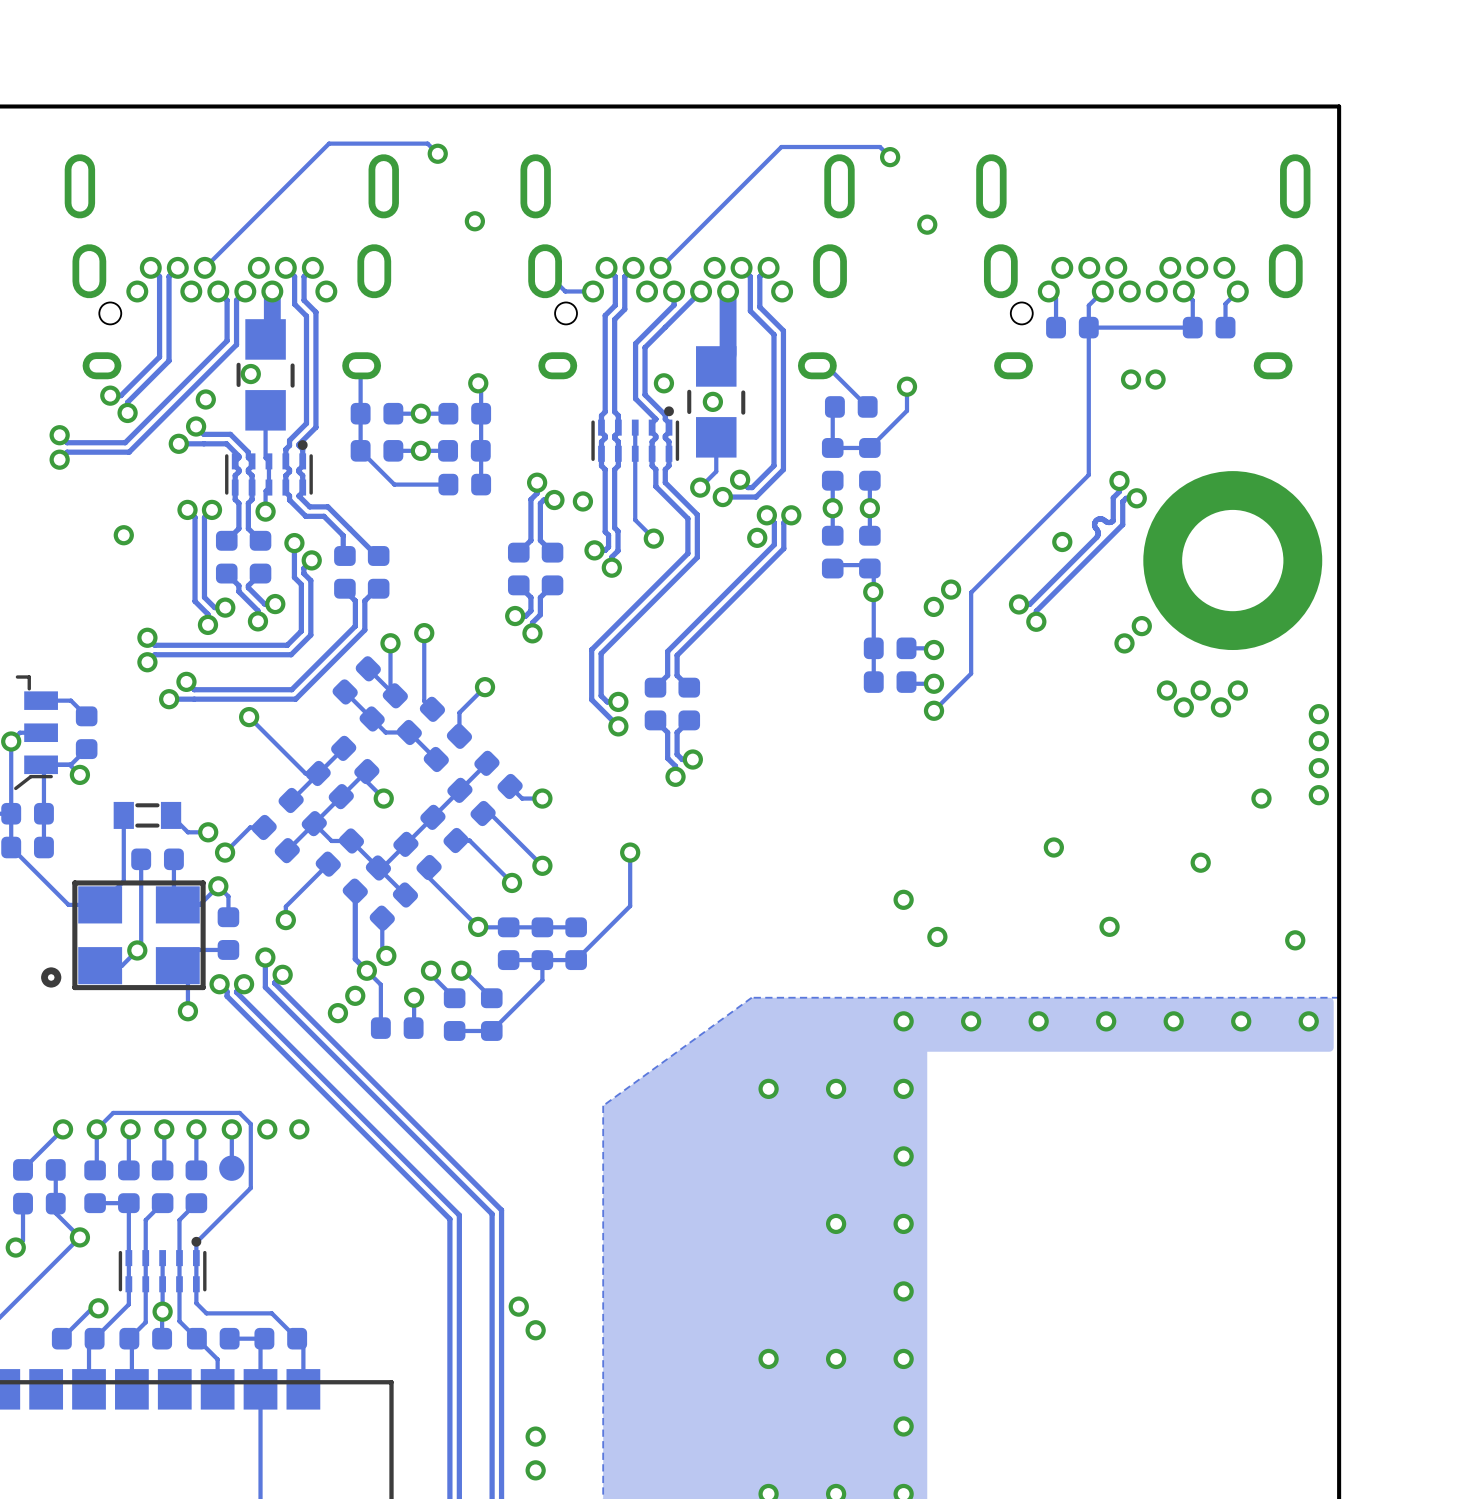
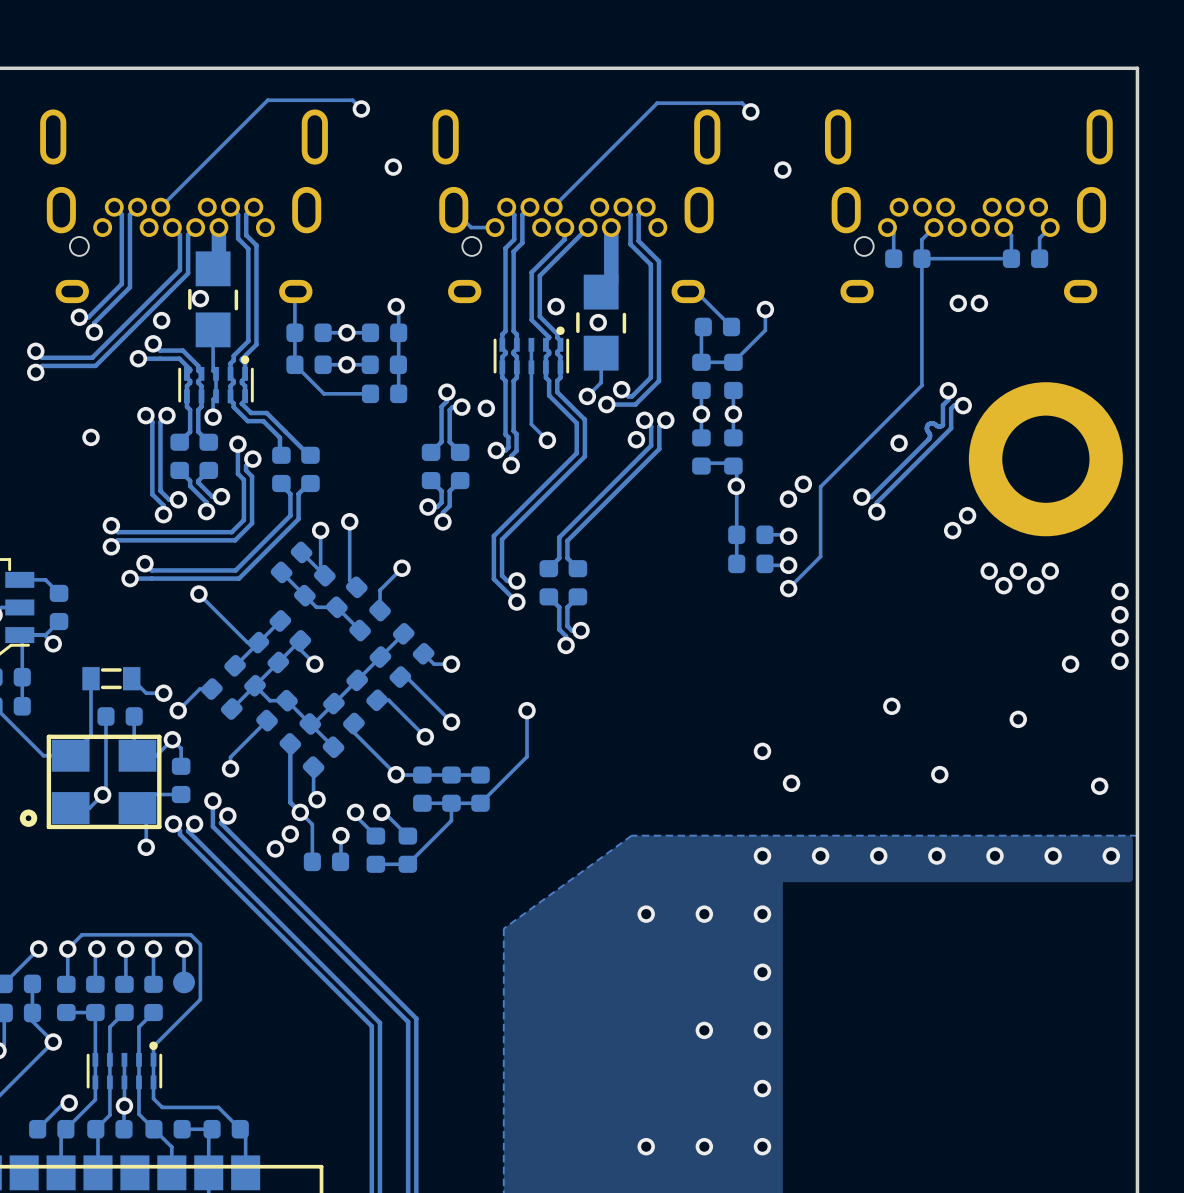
via: (267, 1129) -> none
via: (299, 1129) -> none
via: (518, 1306) -> none
via: (535, 1330) -> none

